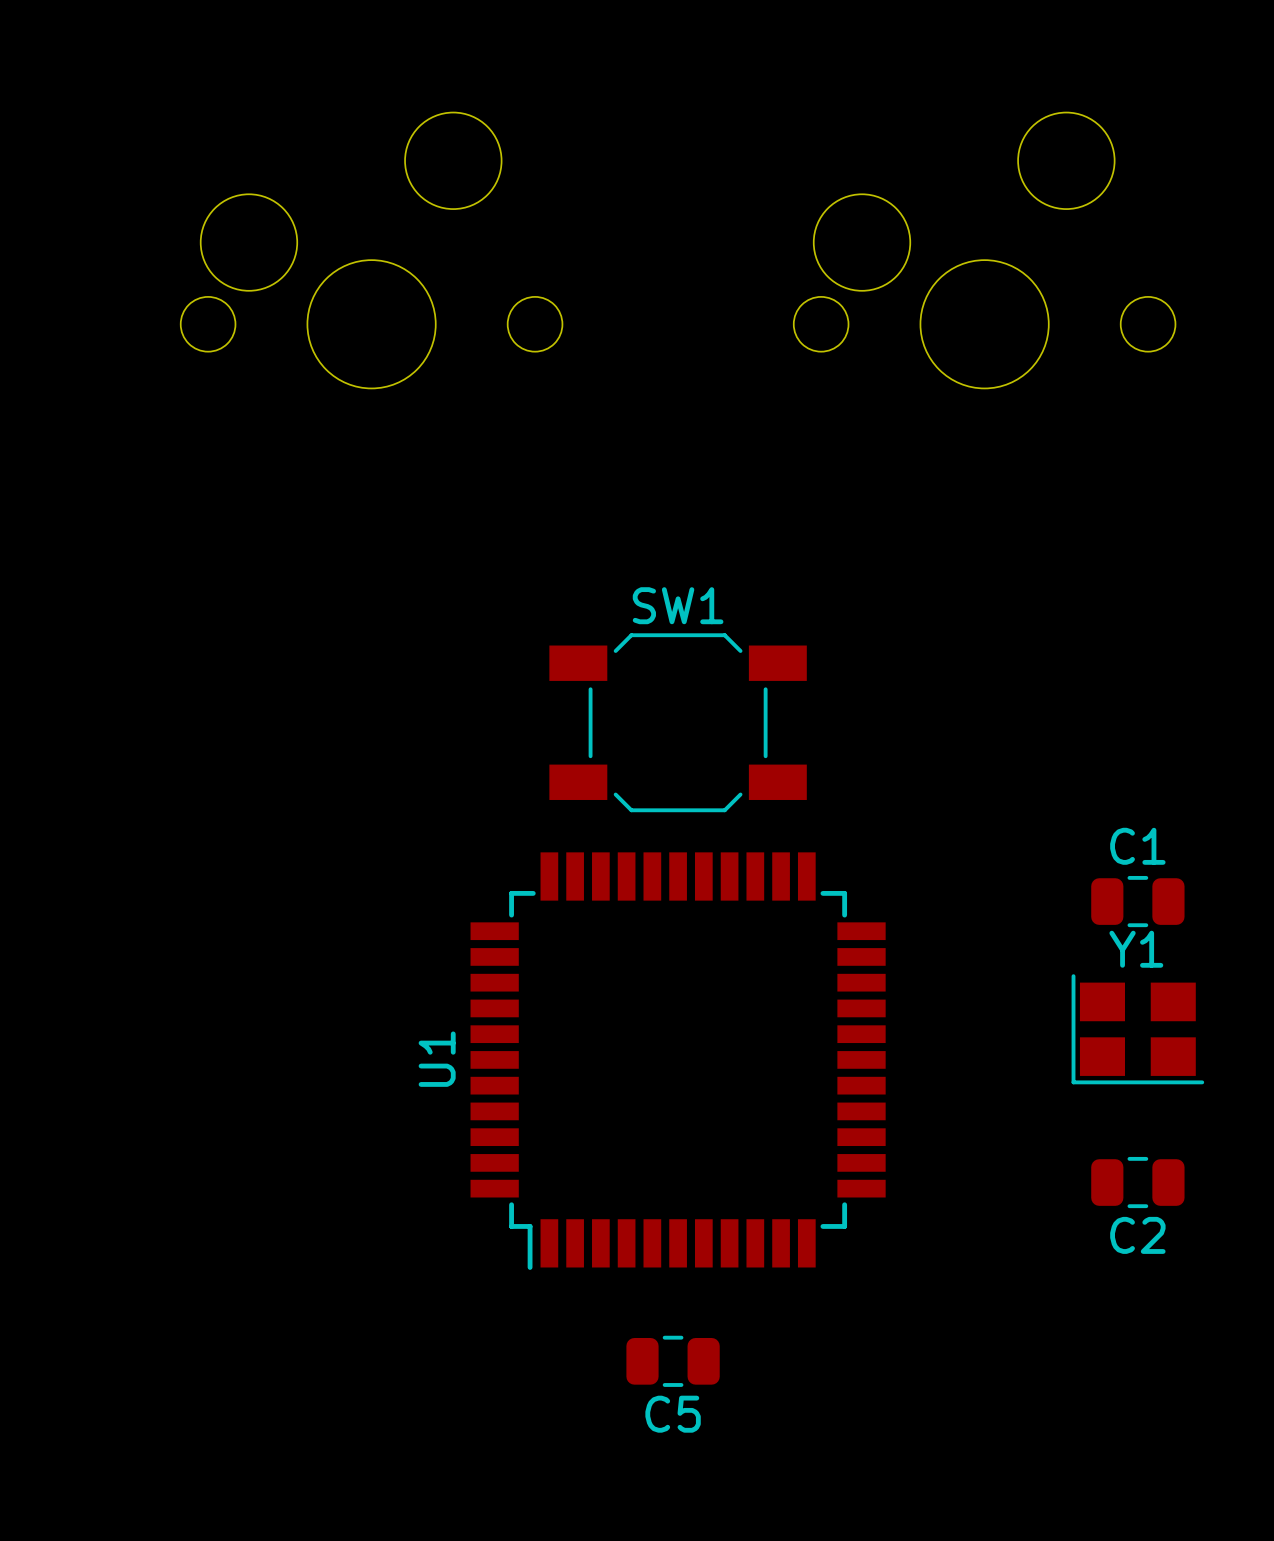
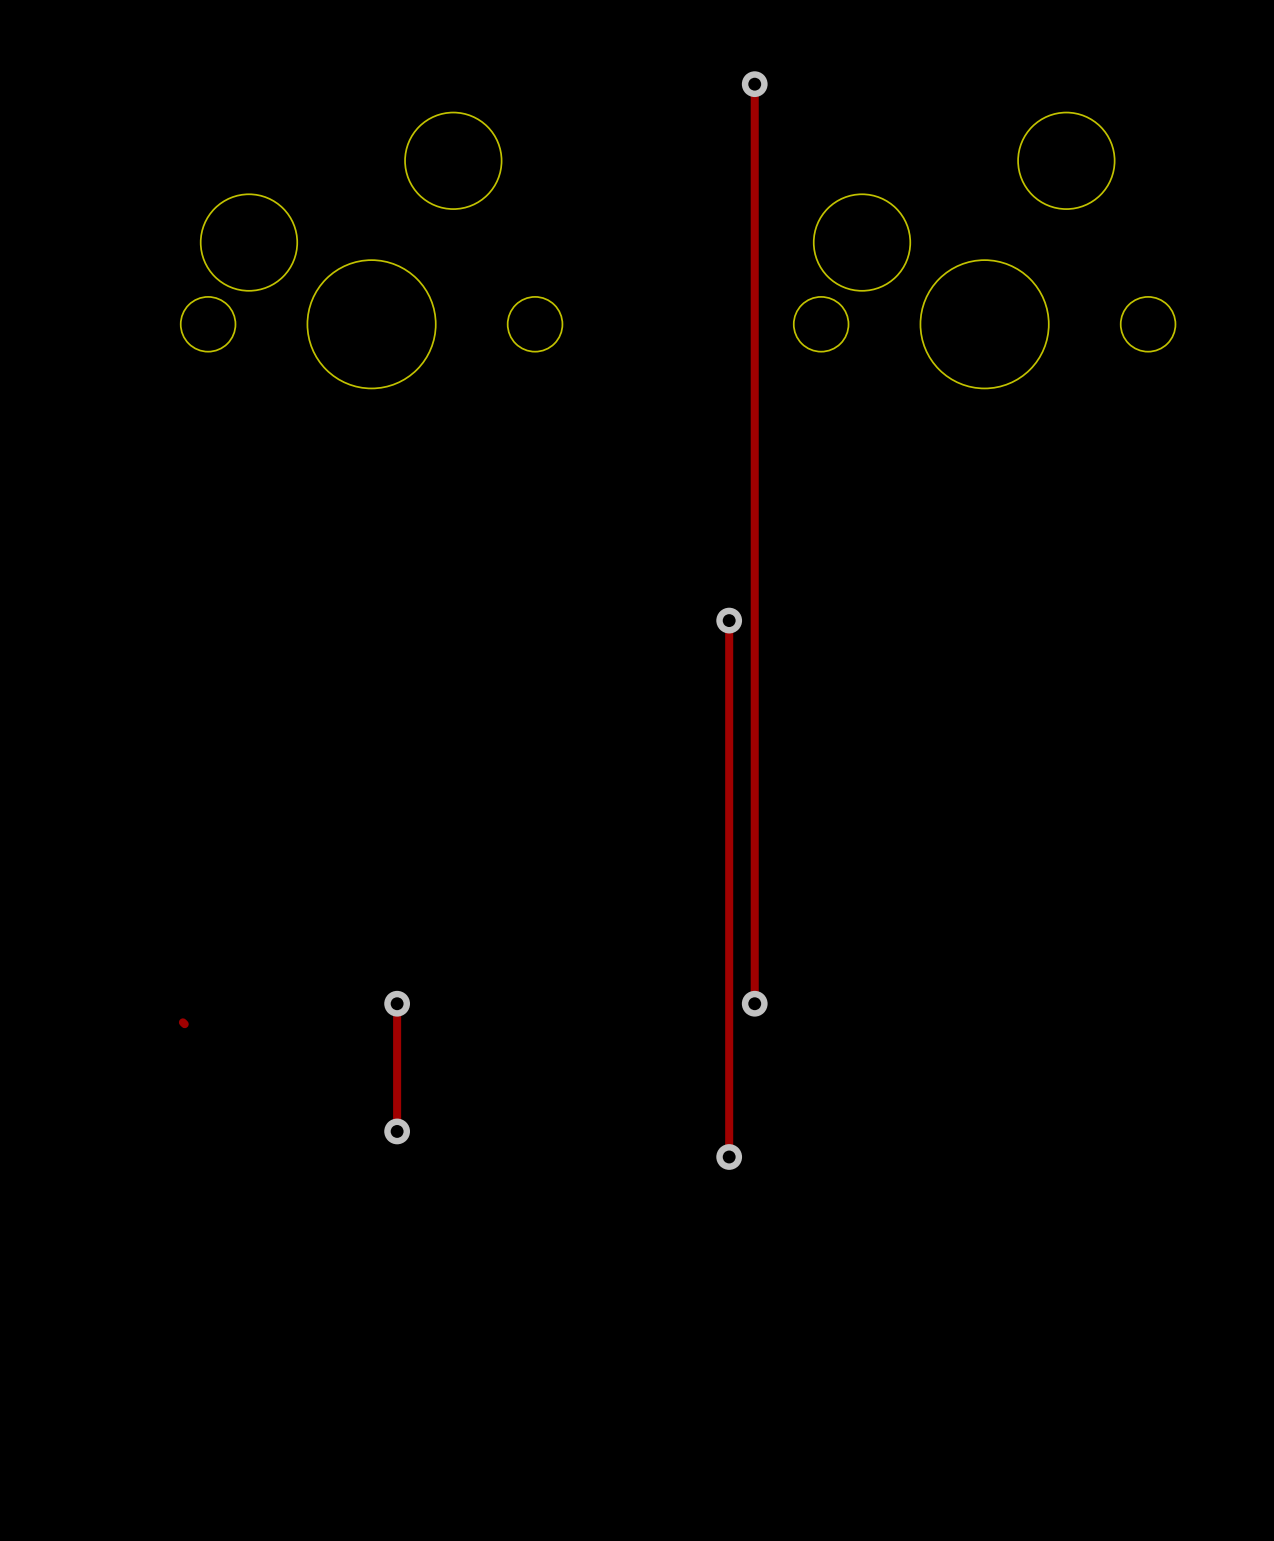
track: none -> (754, 84) (754, 1003)
via: none -> (754, 84)
track: none -> (729, 620) (729, 1156)
via: none -> (729, 620)
SW1: (678, 722) -> none
C1: (1137, 901) -> none
track: none -> (397, 1003) (397, 1131)
via: none -> (397, 1003)
via: none -> (754, 1003)
track: none -> (182, 1022) (184, 1024)
Y1: (1137, 1029) -> none
U1: (678, 1061) -> none
via: none -> (397, 1131)
via: none -> (729, 1156)
C2: (1137, 1182) -> none
C5: (673, 1361) -> none

